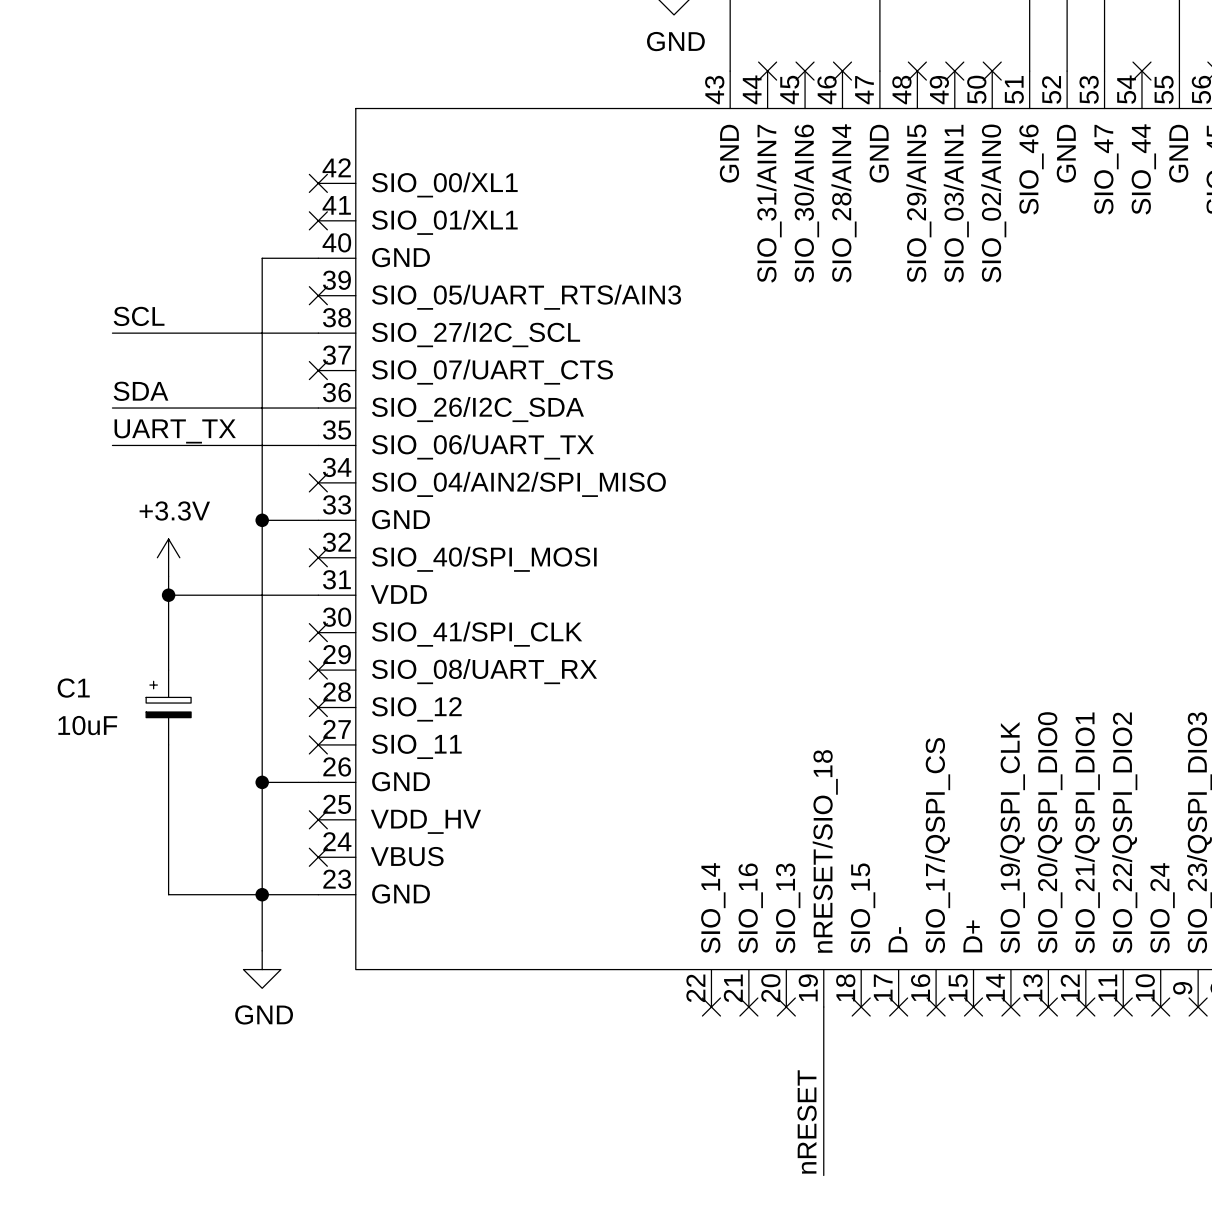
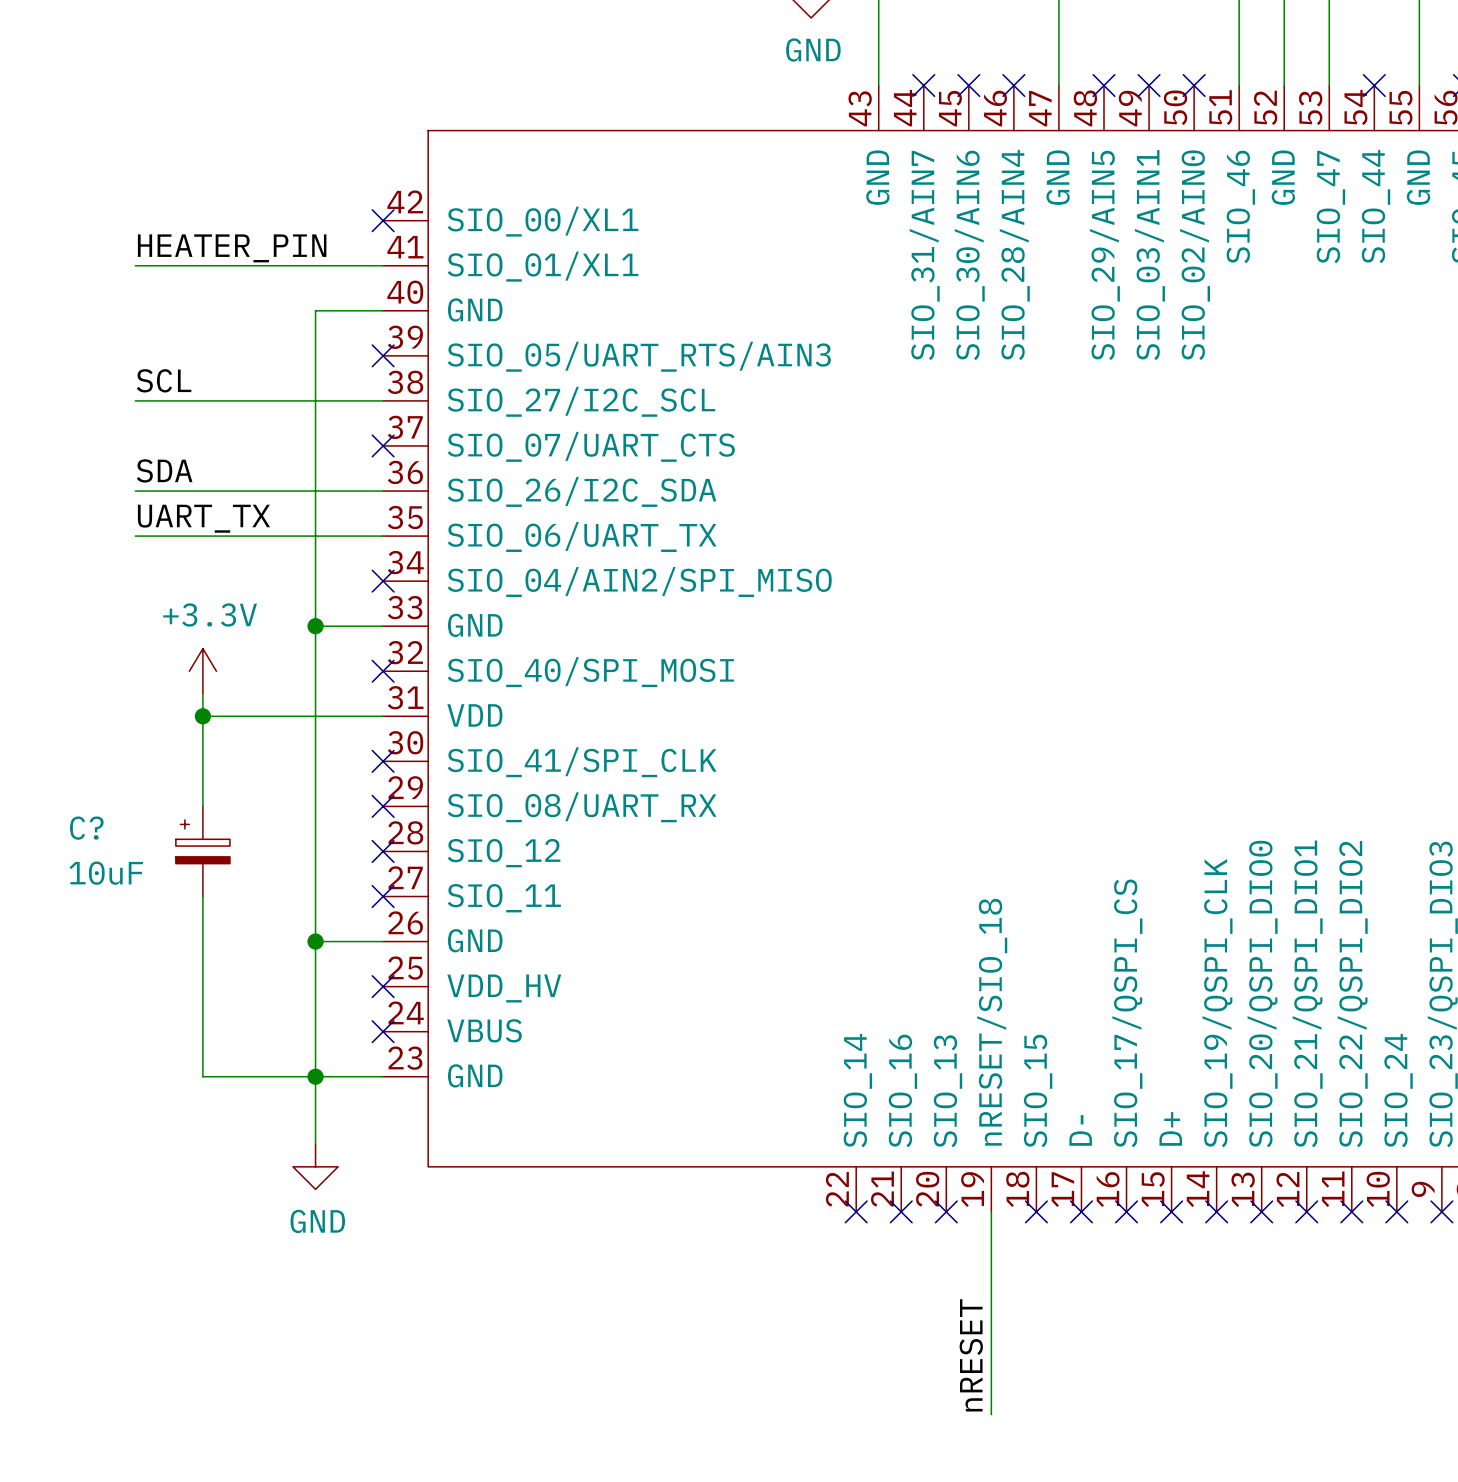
label: none -> HEATER_PIN (232, 248)
wire: none -> (135, 265) (383, 265)
no-connect mark: (318, 220) -> none
C1 name: C1 (73, 688) -> C? (86, 828)

